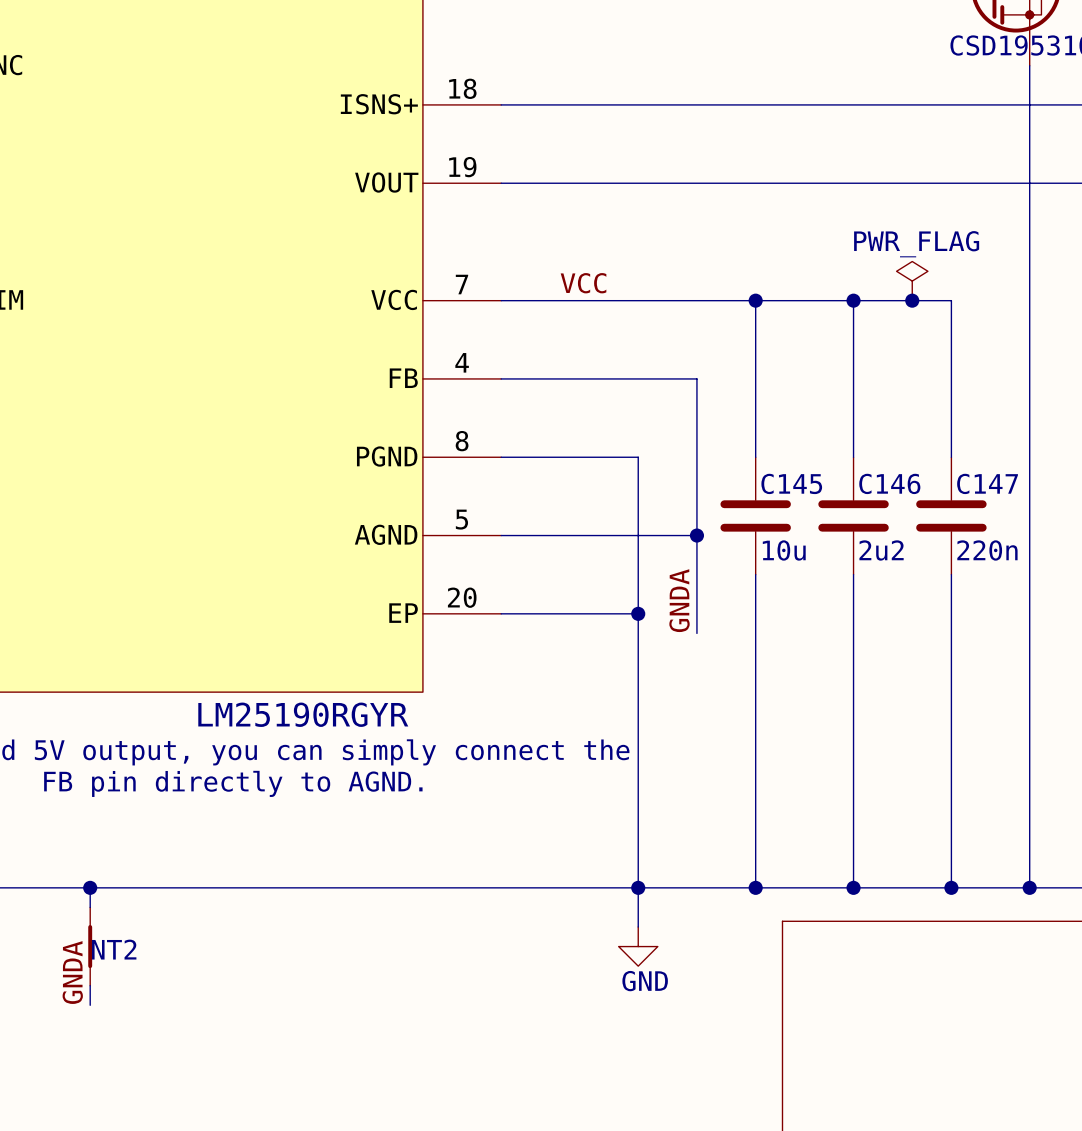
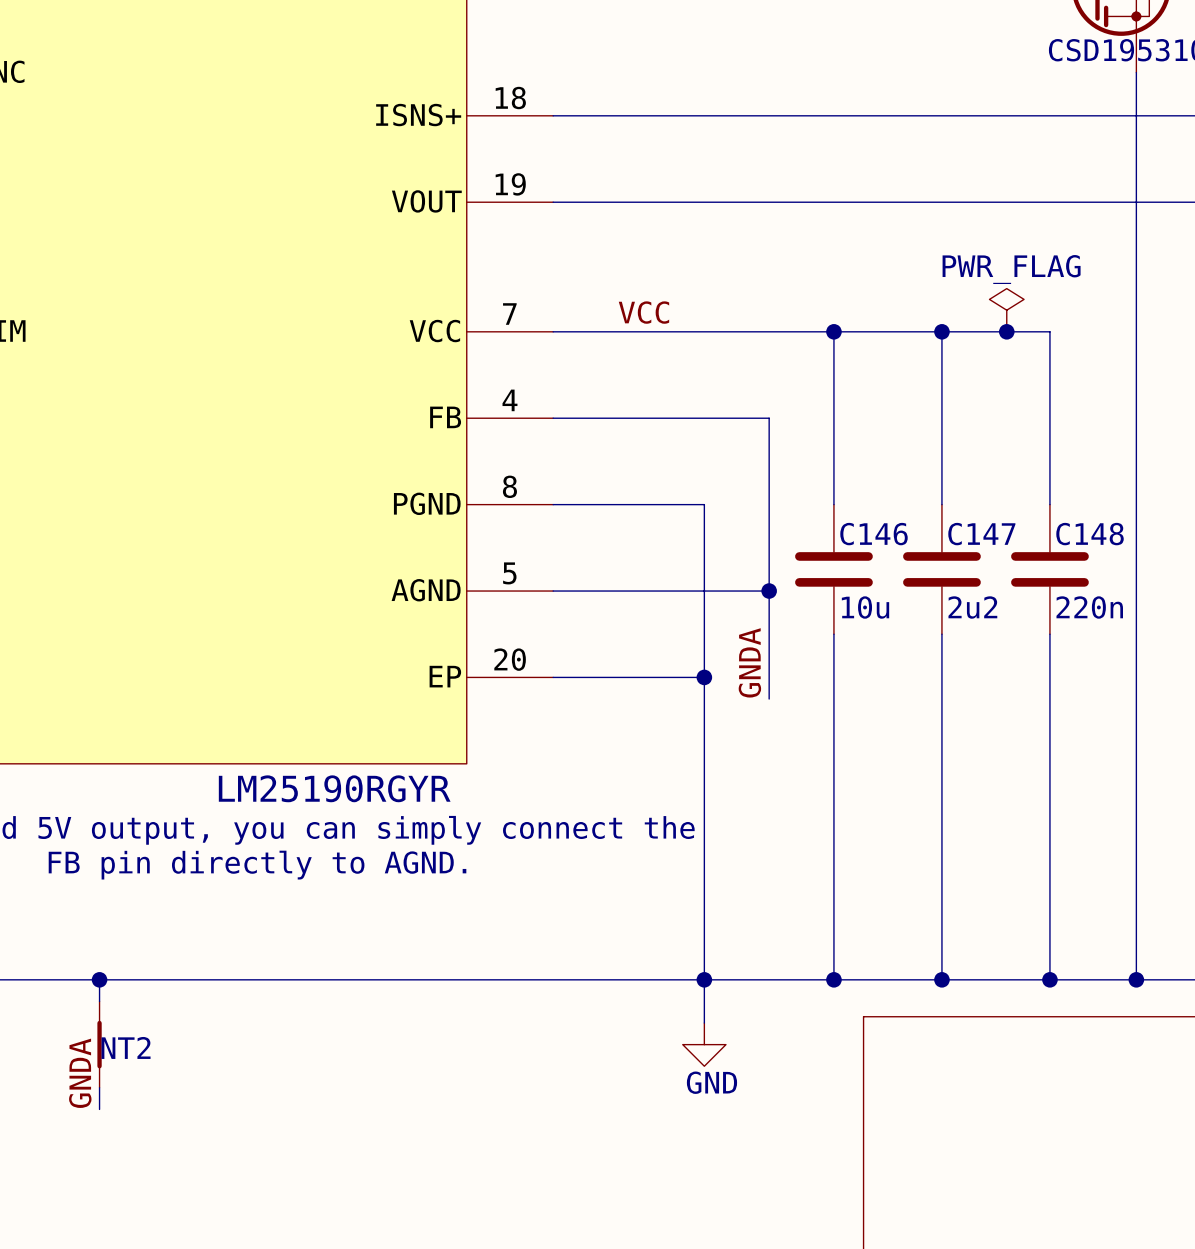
C145 name: C145 (791, 483) -> C146 (874, 534)
C146 name: C146 (889, 483) -> C147 (981, 534)
C147 name: C147 (987, 483) -> C148 (1090, 534)

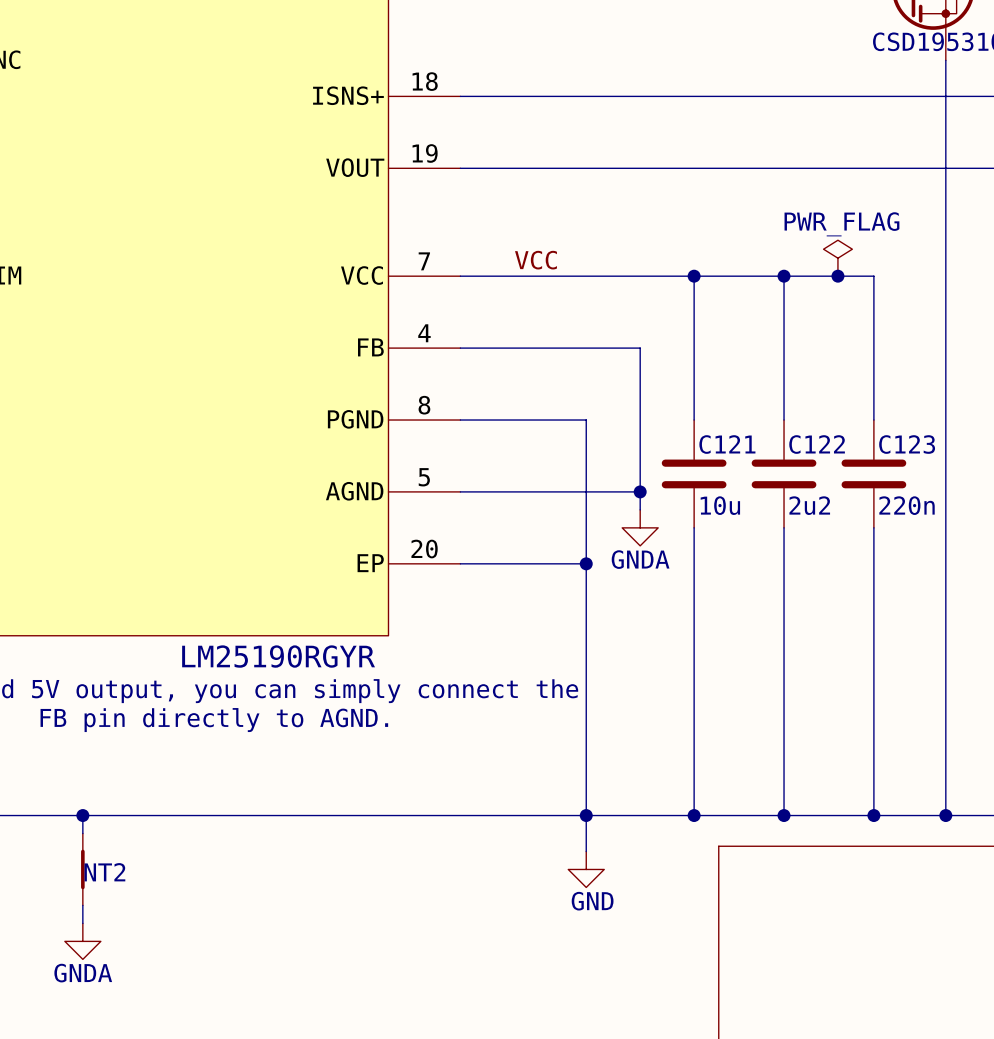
C146 name: C146 (874, 534) -> C121 (727, 444)
C147 name: C147 (981, 534) -> C122 (817, 444)
C148 name: C148 (1090, 534) -> C123 (907, 444)
wire: (769, 612) (769, 699) -> none
power symbol: none -> GNDA (640, 527)
label: GNDA (749, 662) -> none
label: GNDA (80, 1073) -> none
power symbol: none -> GNDA (82, 941)

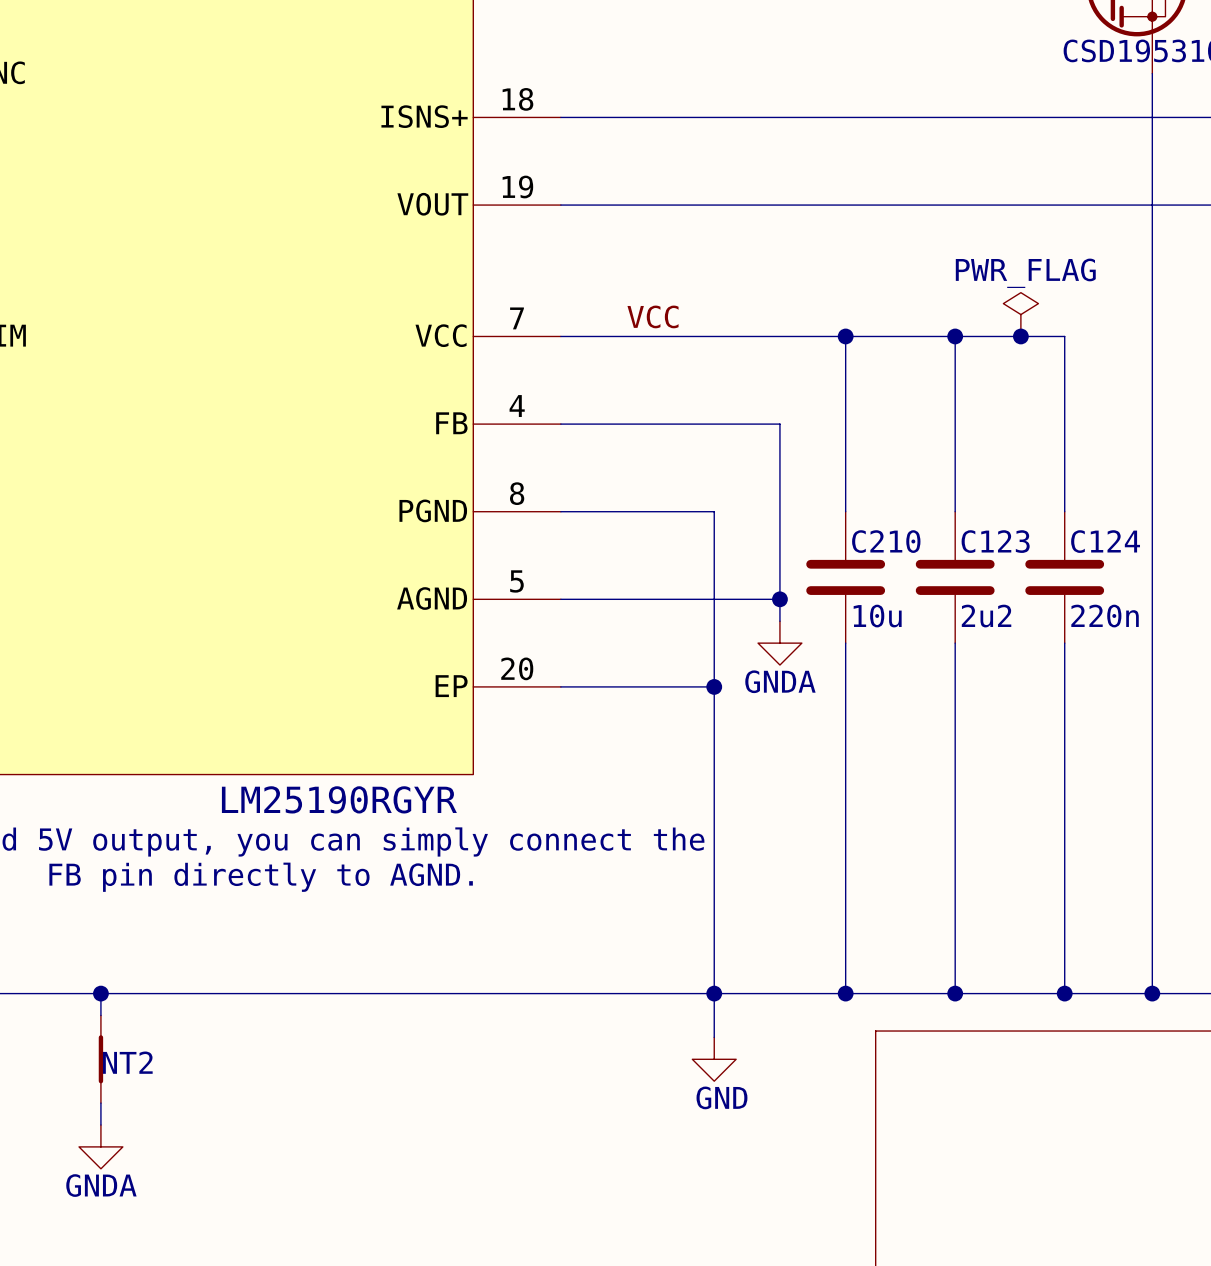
C121 name: C121 (727, 444) -> C210 (886, 541)
C122 name: C122 (817, 444) -> C123 (995, 541)
C123 name: C123 (907, 444) -> C124 (1105, 541)

